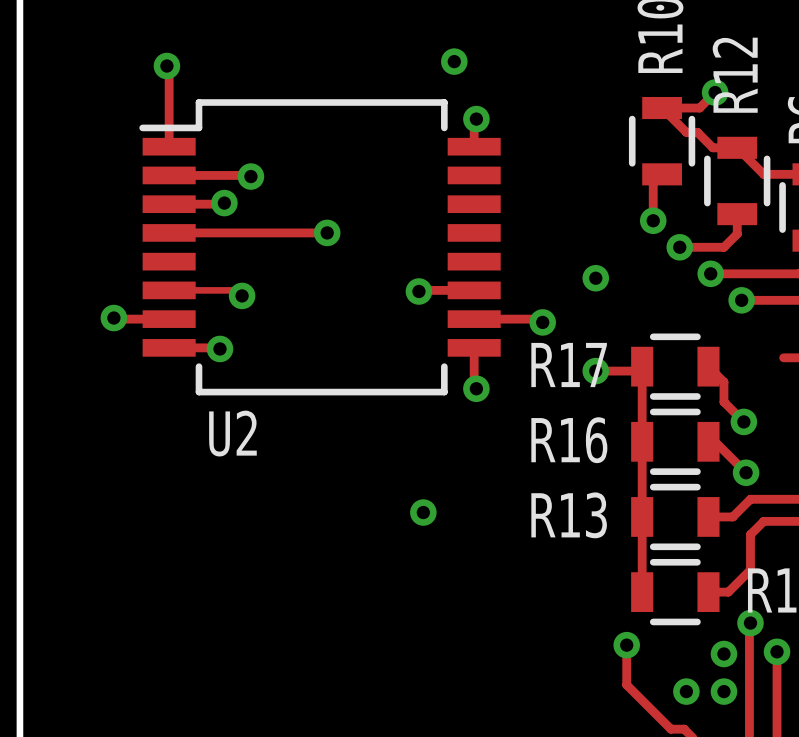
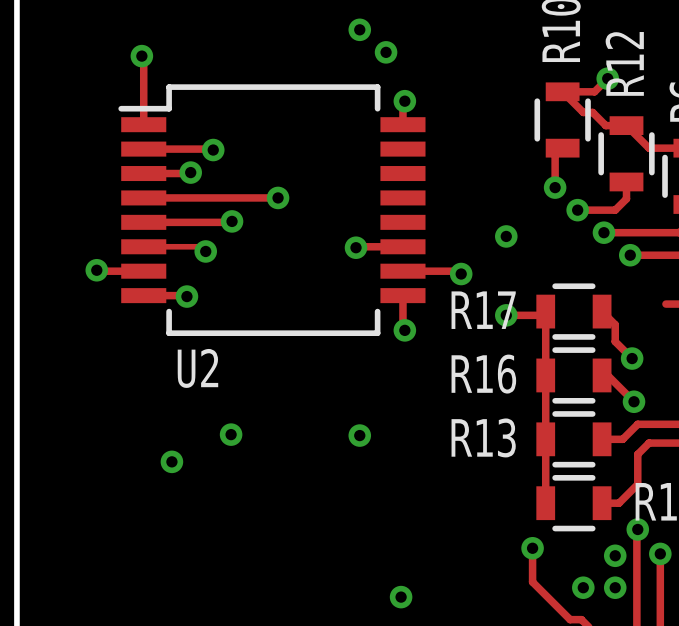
via: none -> (359, 29)
track: none -> (232, 221) (143, 222)
via: none -> (232, 221)
via: none -> (231, 434)
via: none -> (171, 461)
via: none -> (401, 597)

